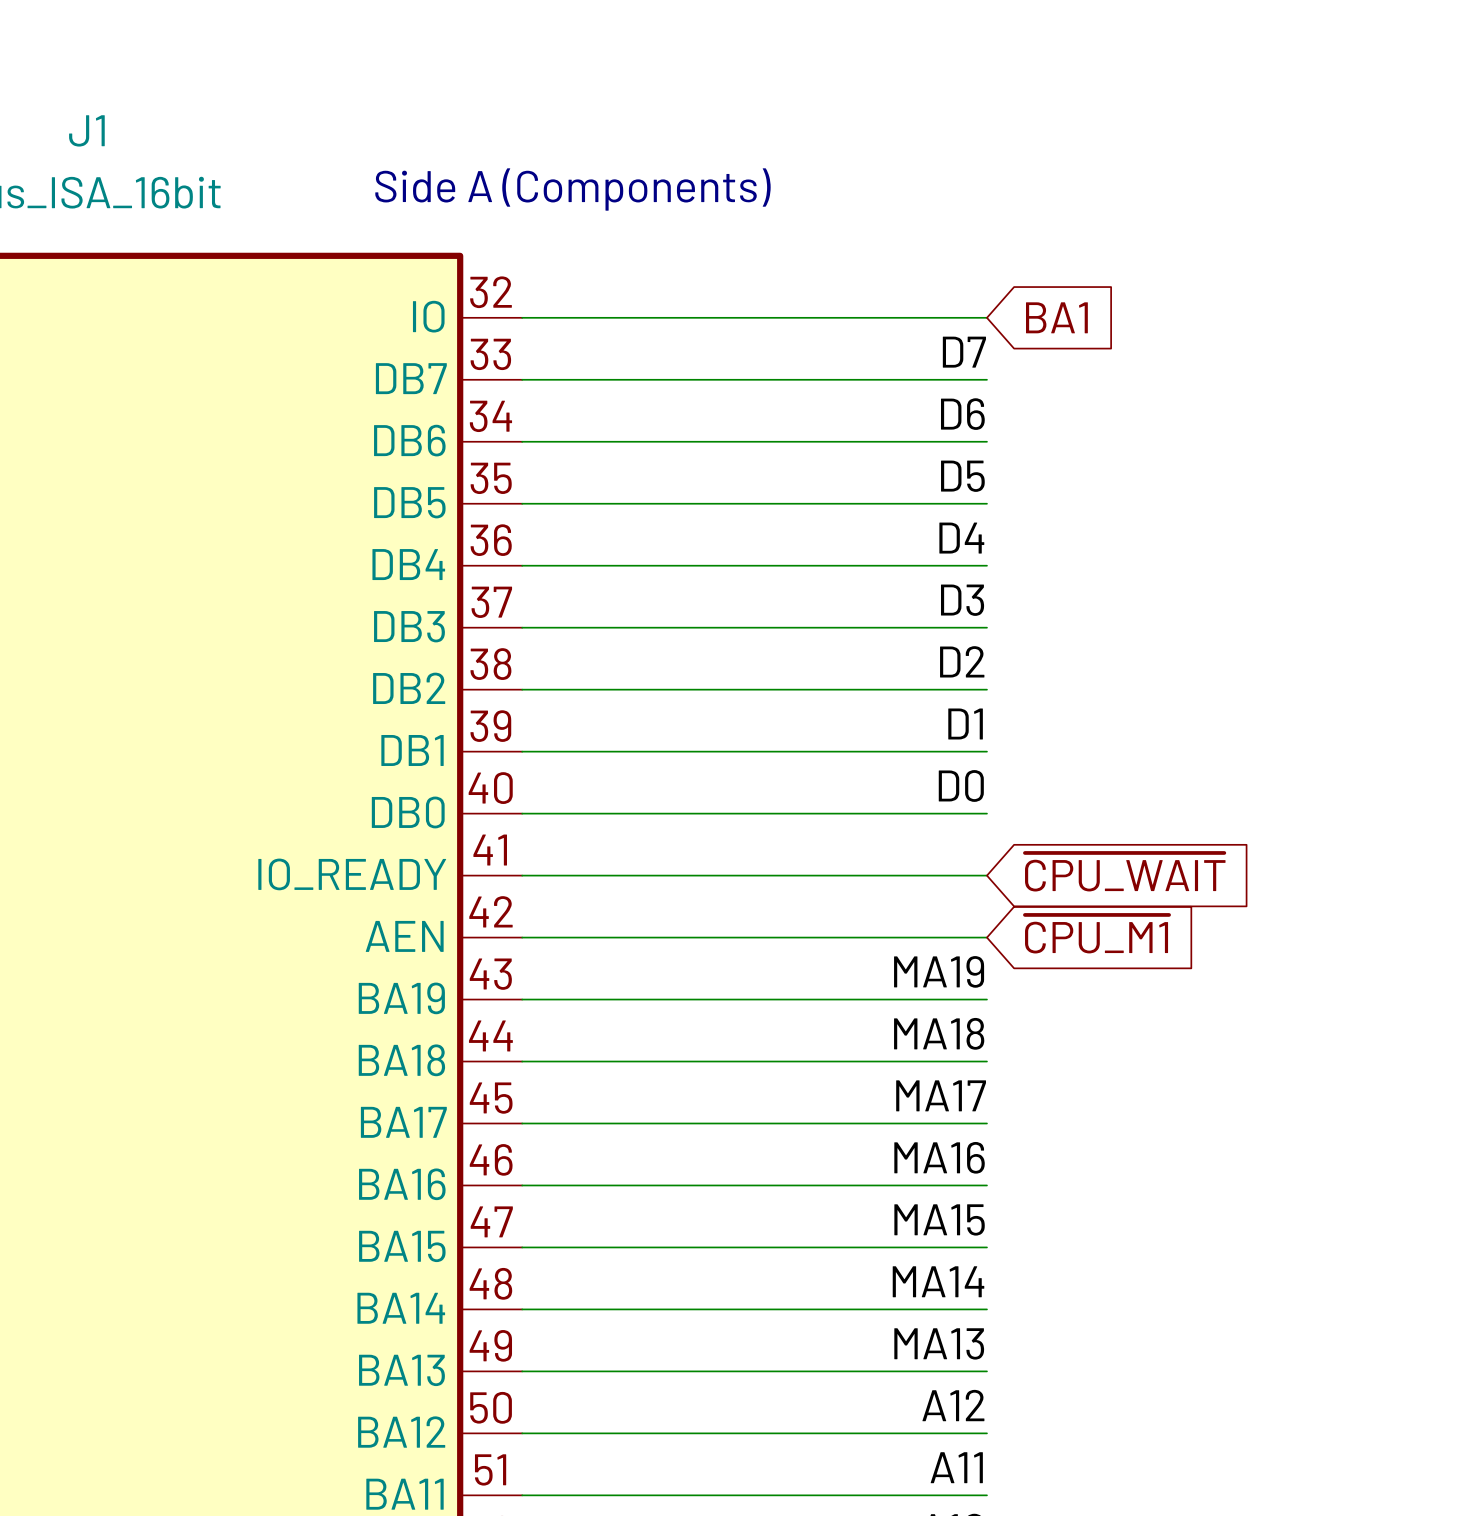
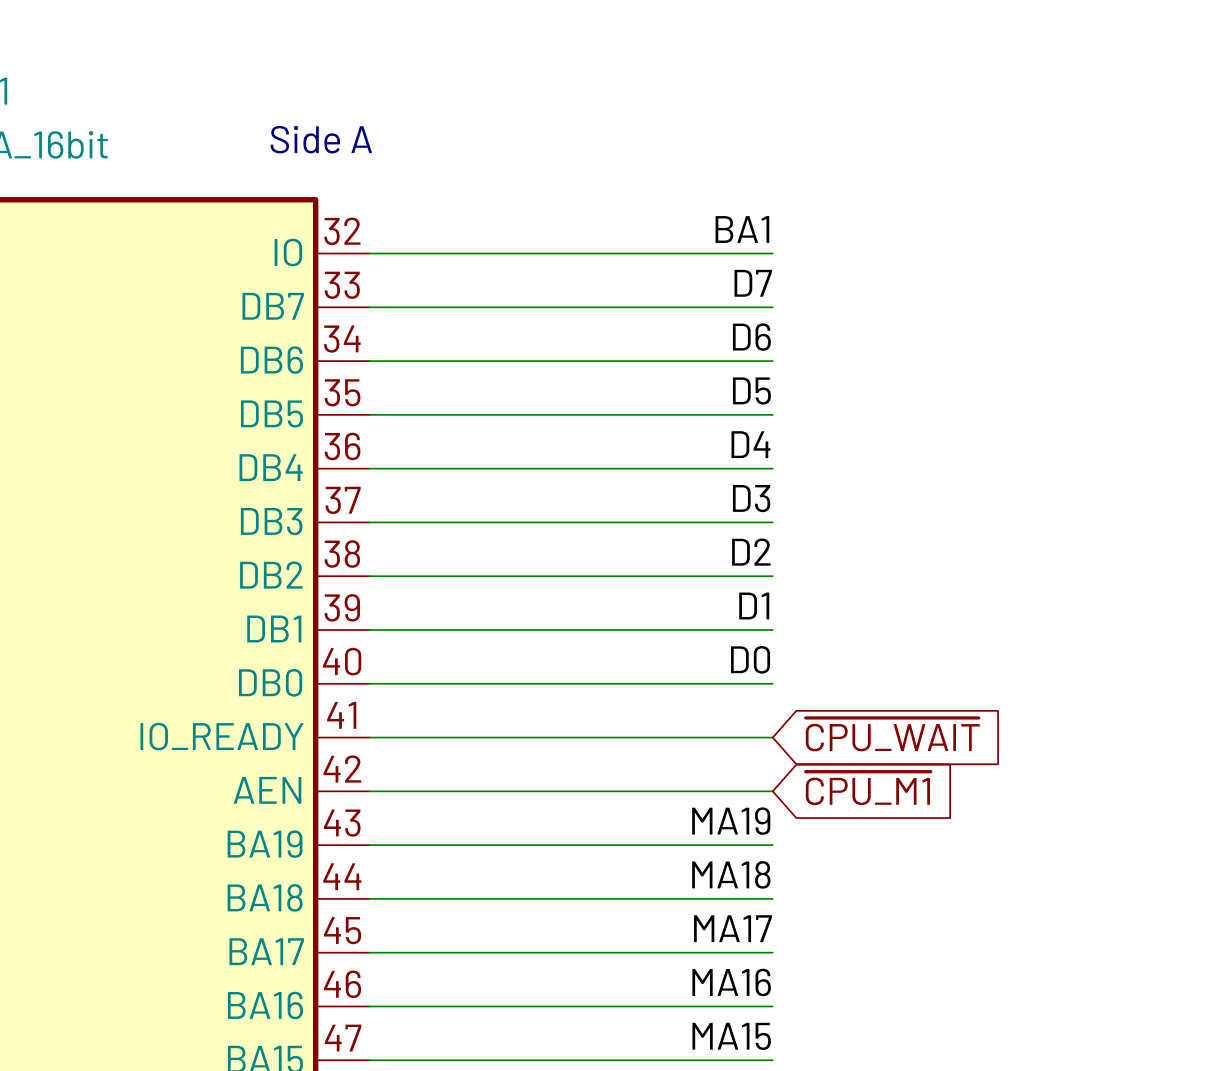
text: none -> Side A (321, 139)
text: Side A (Components) (572, 189) -> none
label: none -> BA1 (742, 229)
global label: BA1 (1056, 317) -> none

